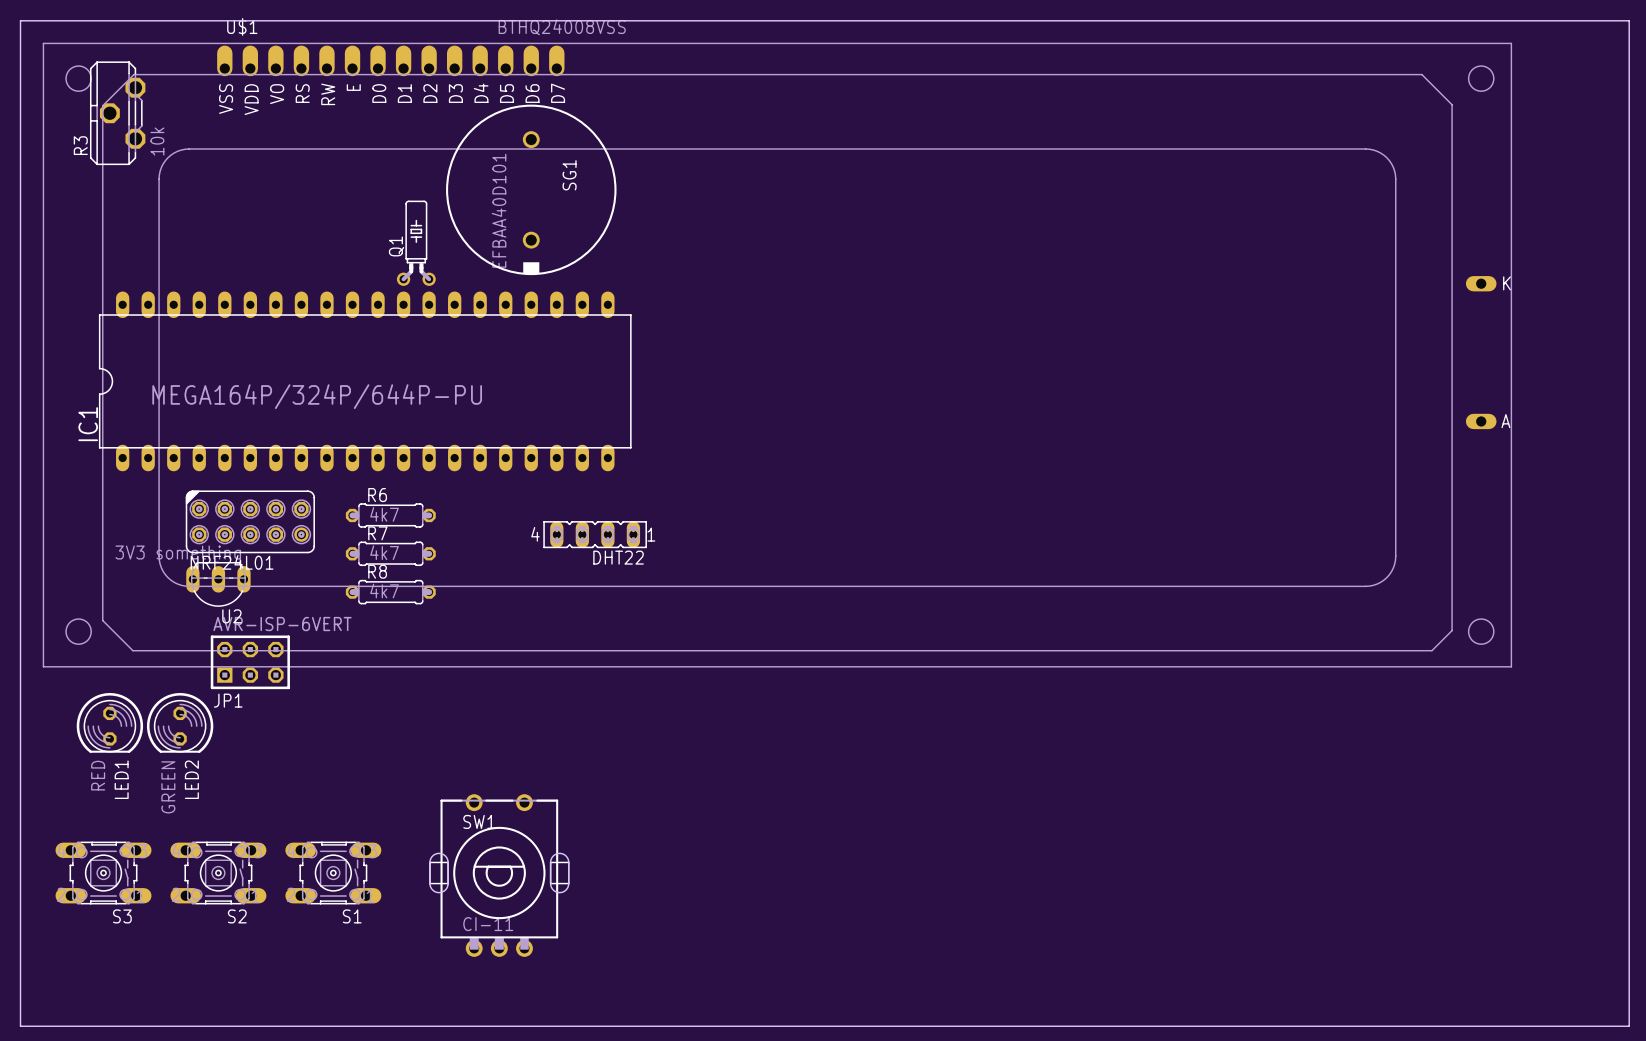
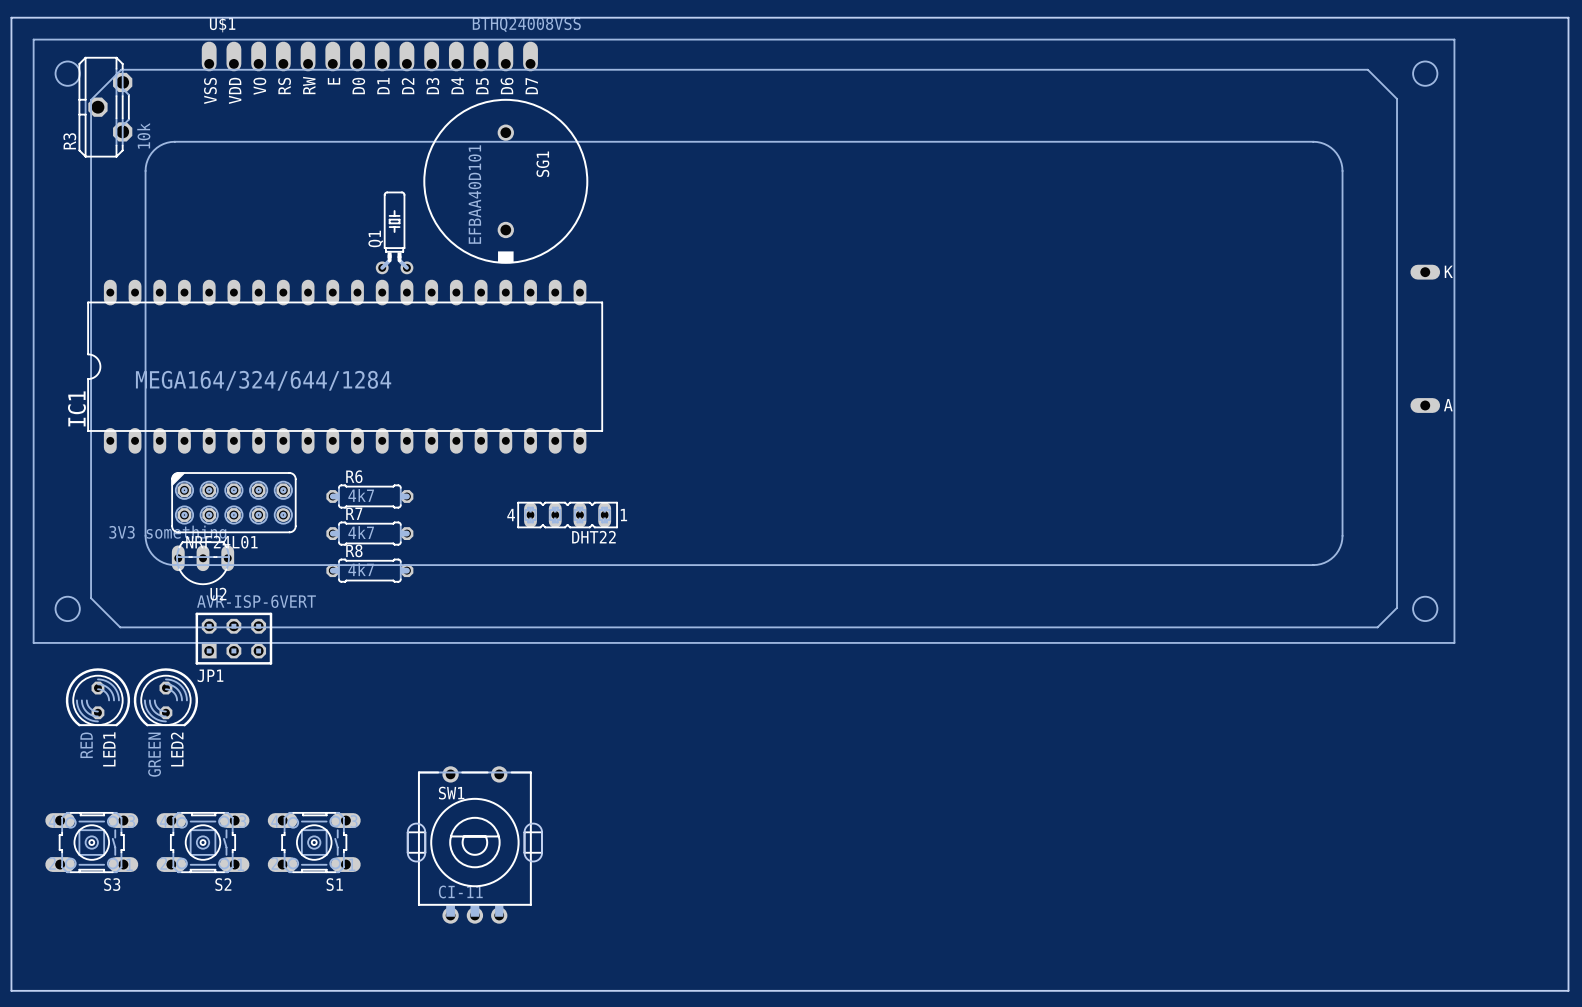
IC1 value: MEGA164P/324P/644P-PU (317, 396) -> MEGA164/324/644/1284 (263, 380)

